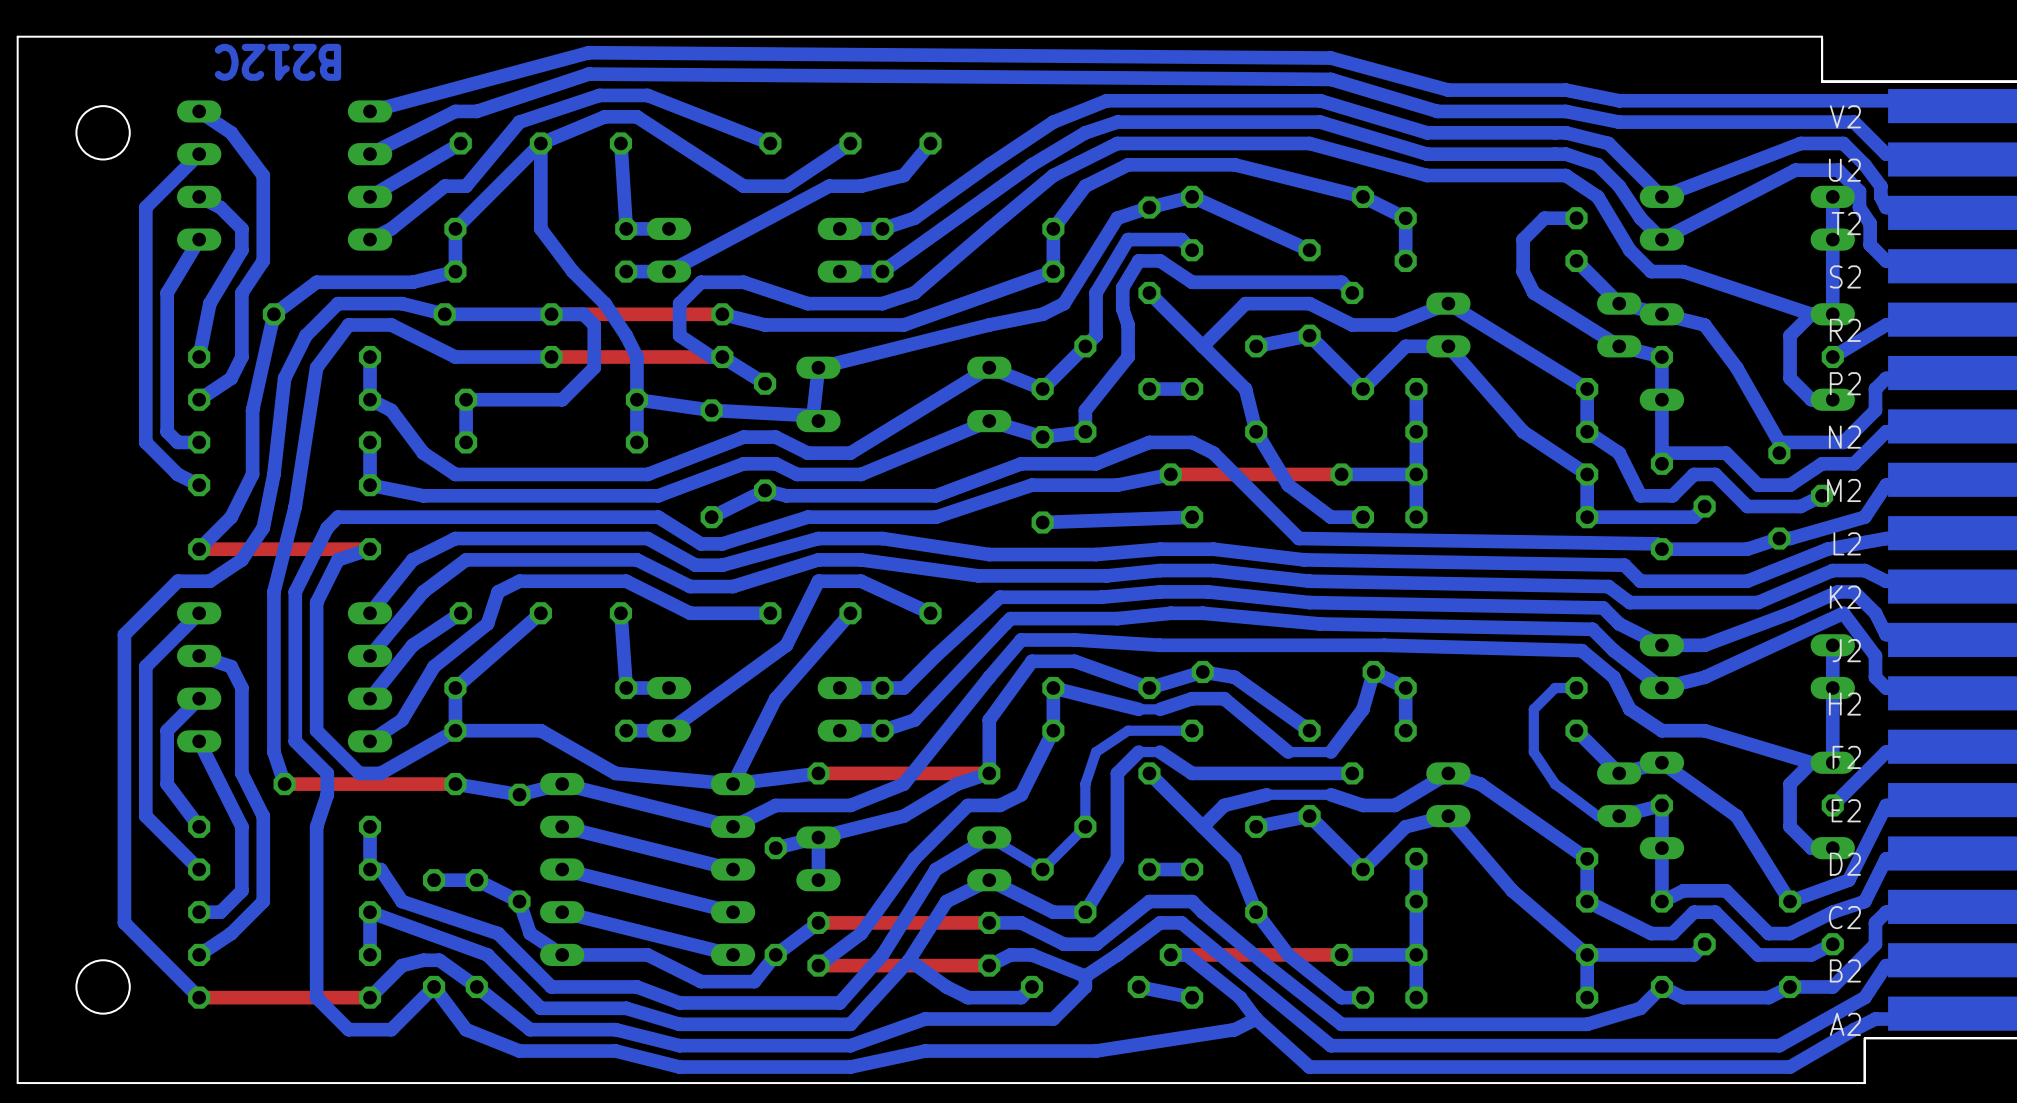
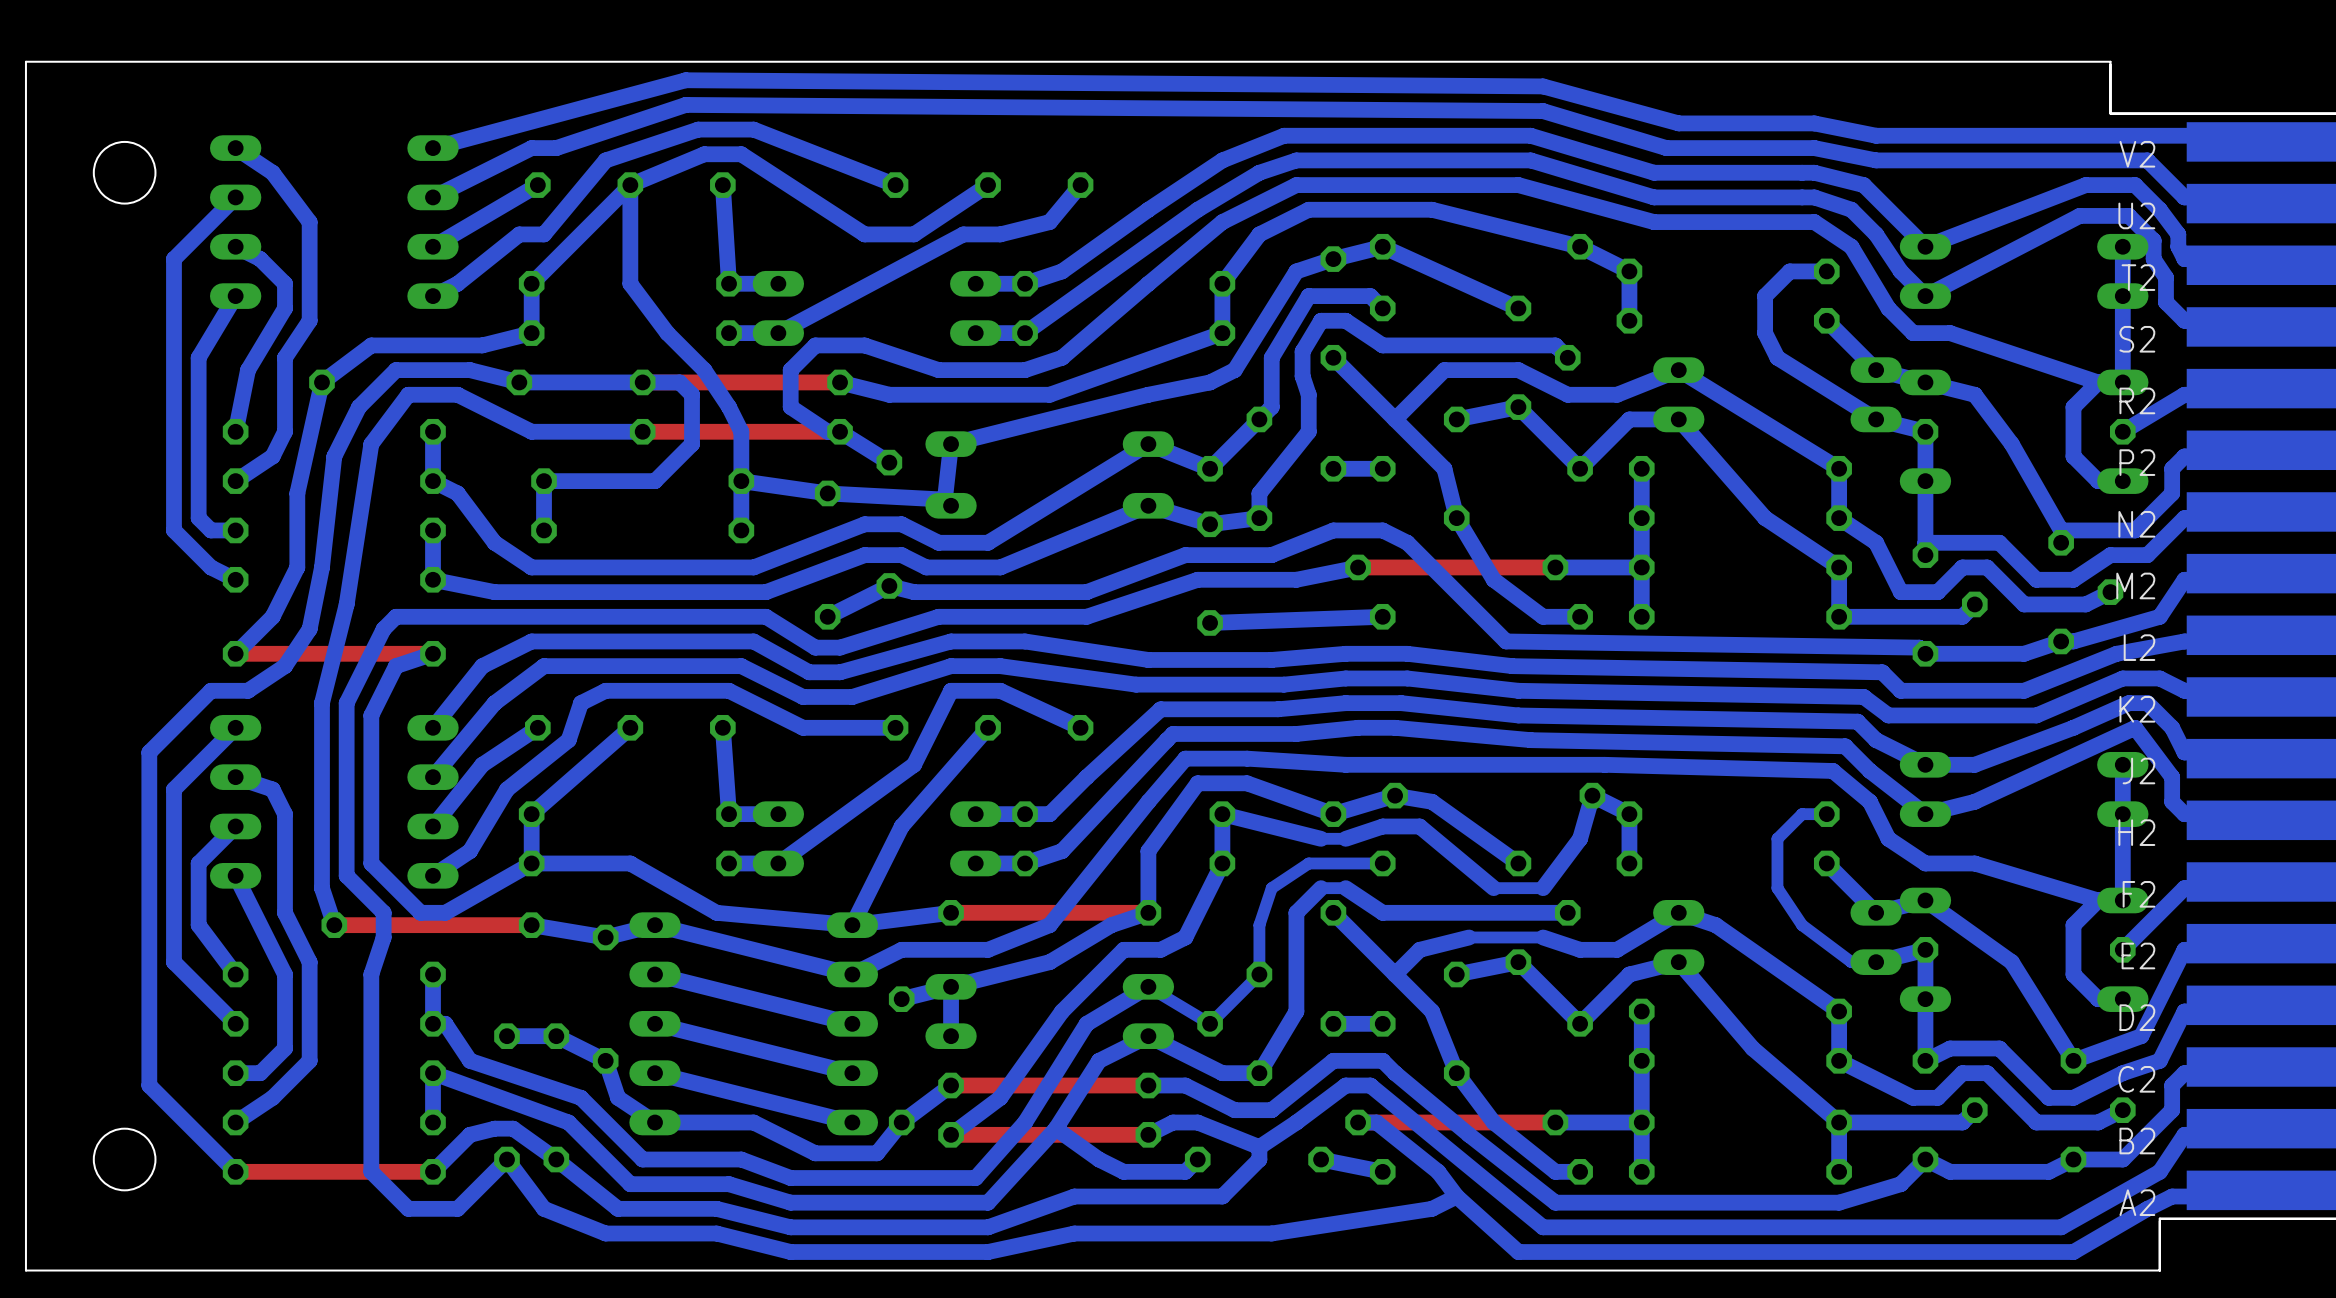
text: B212C (277, 62) -> none

